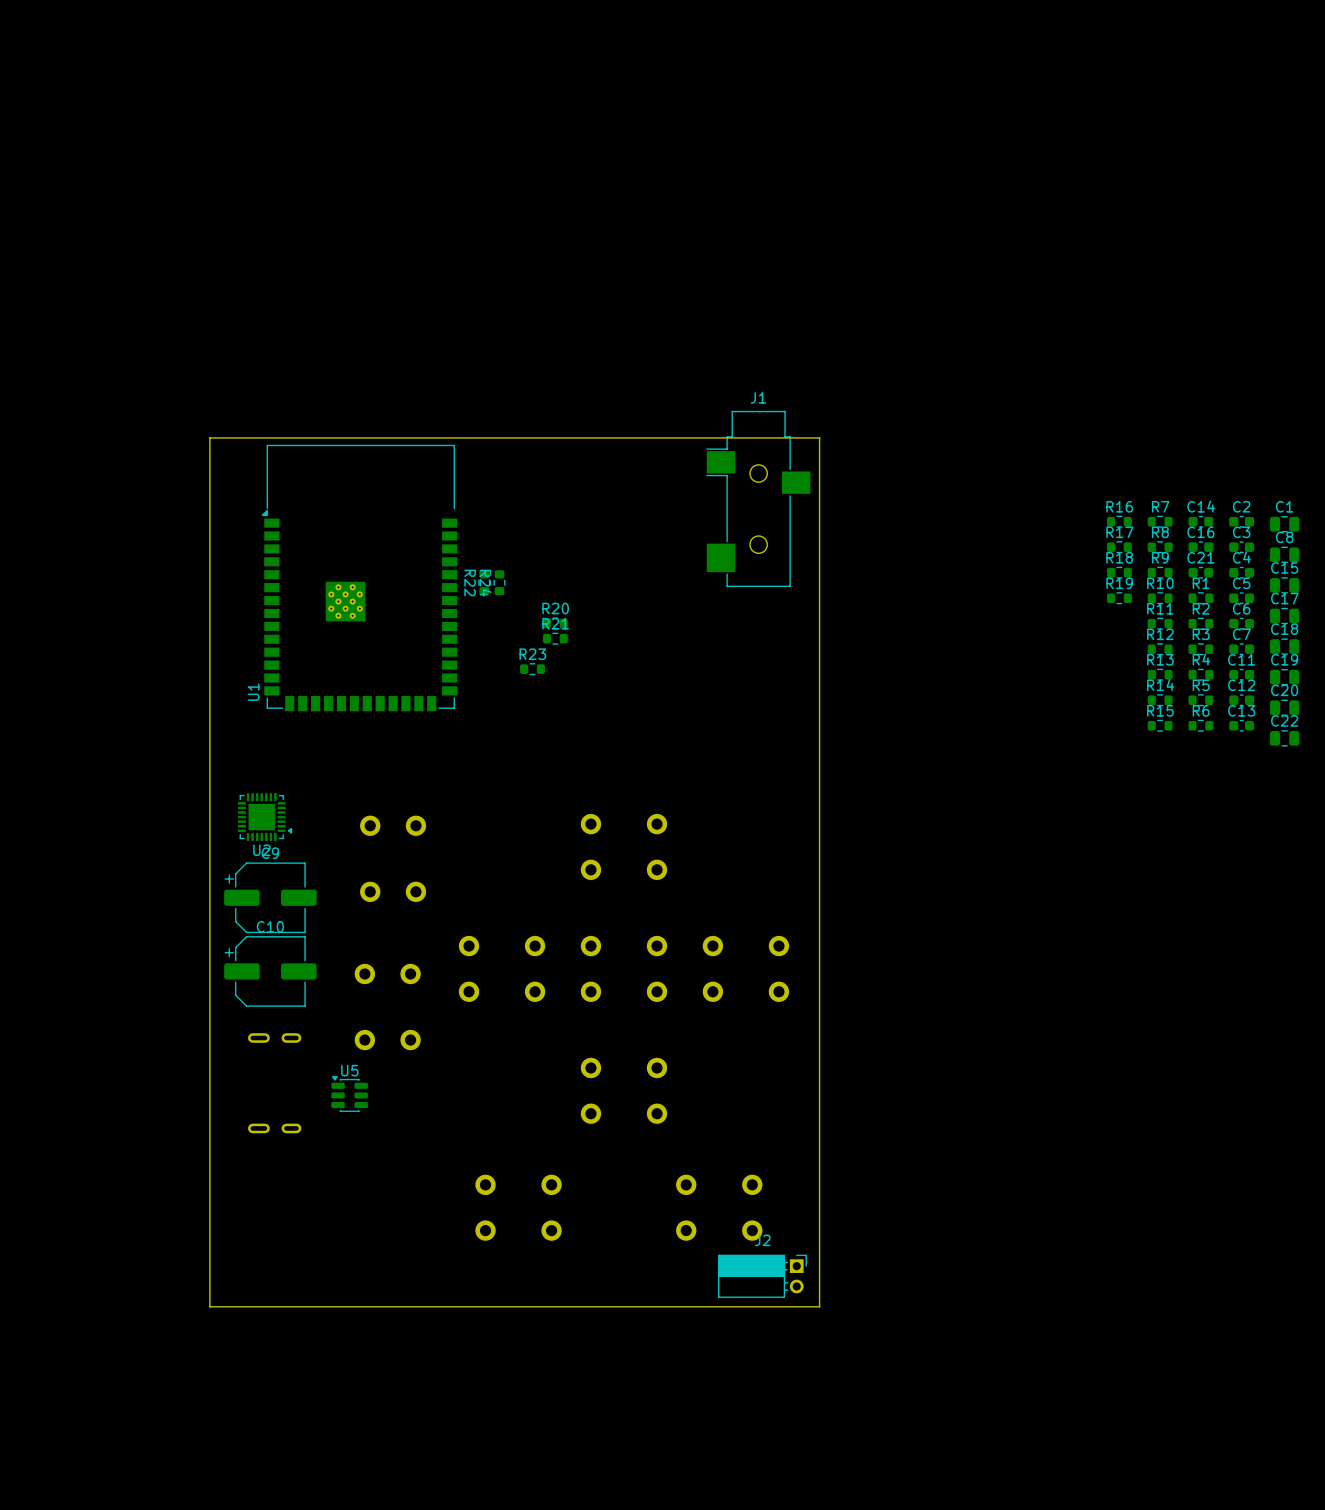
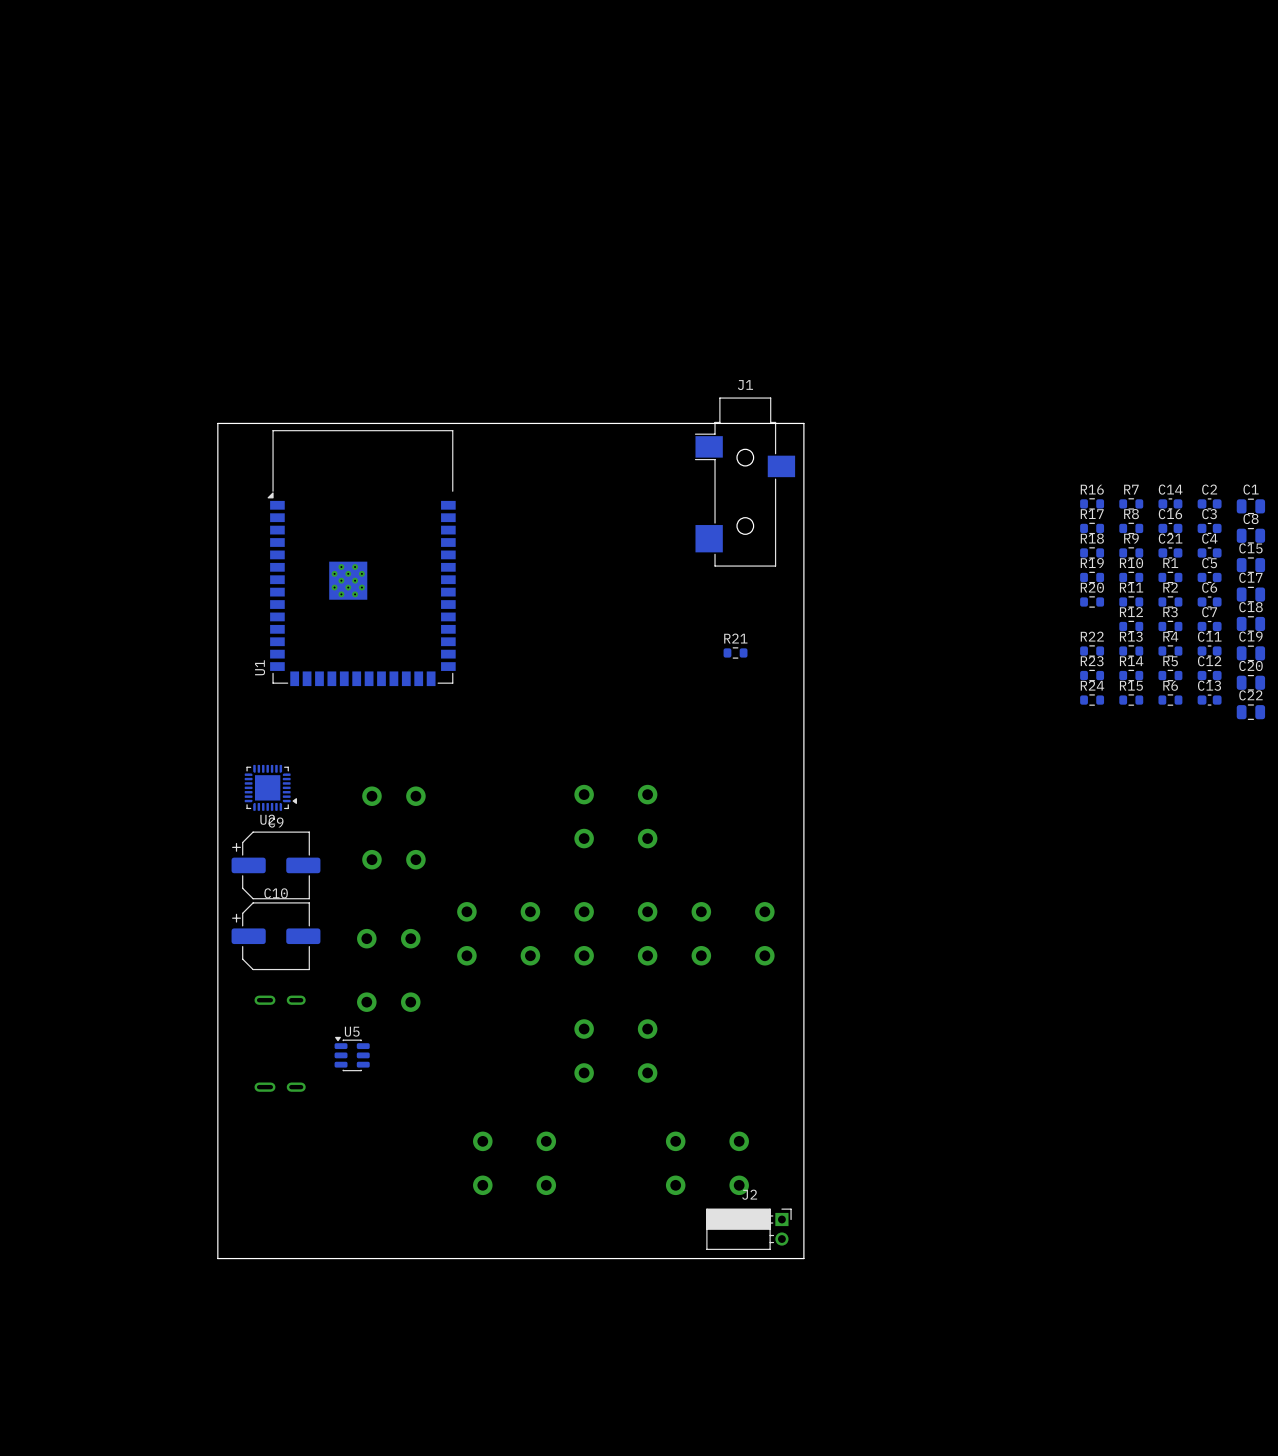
R22 rotation: 0° (484, 582) -> 90° clockwise (1092, 651)
R22 position: (484, 582) -> (1092, 651)
R24 rotation: 0° (499, 582) -> 90° clockwise (1092, 700)
R24 position: (499, 582) -> (1092, 700)
R20 position: (555, 623) -> (1092, 601)
R21 position: (555, 638) -> (735, 652)
R23 position: (532, 669) -> (1092, 675)

